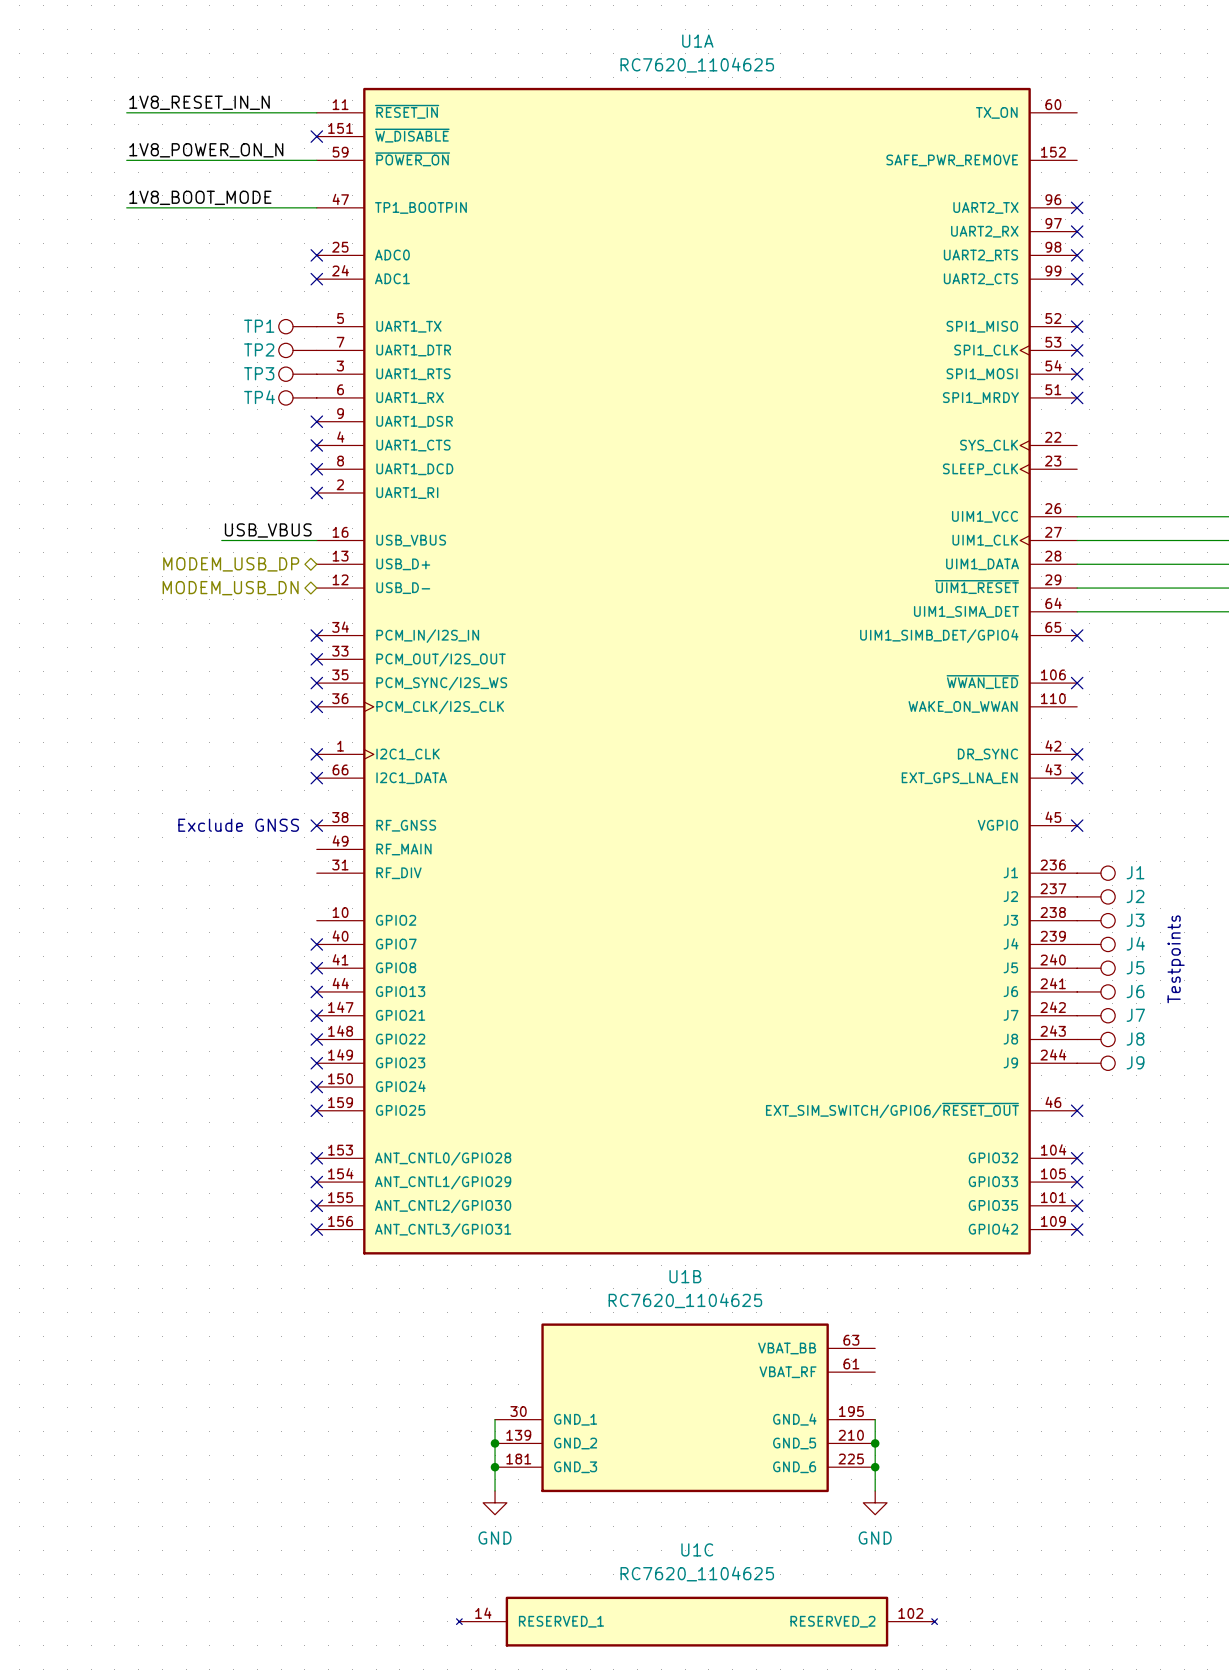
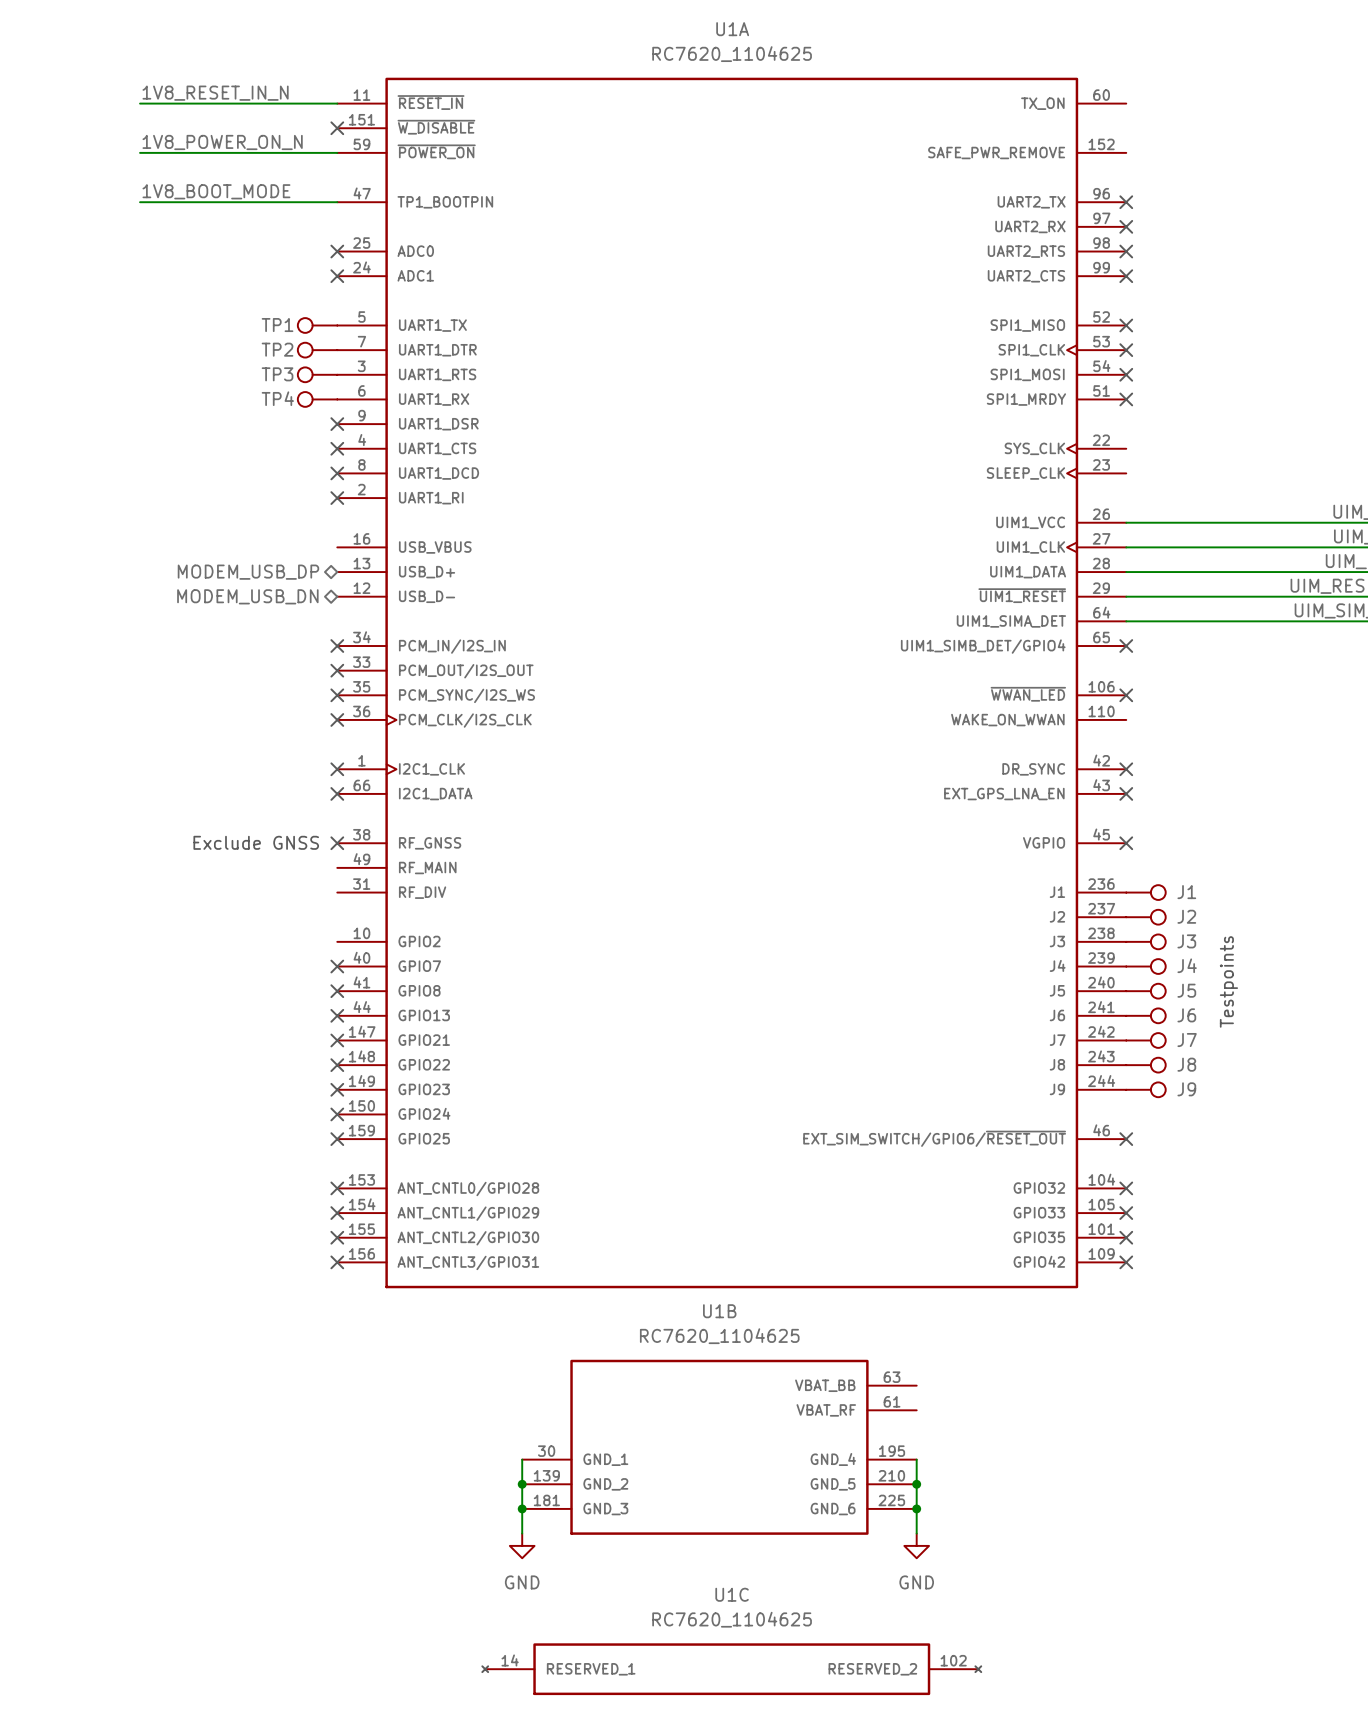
label: USB_VBUS (268, 530) -> none
wire: (221, 540) (316, 540) -> none

